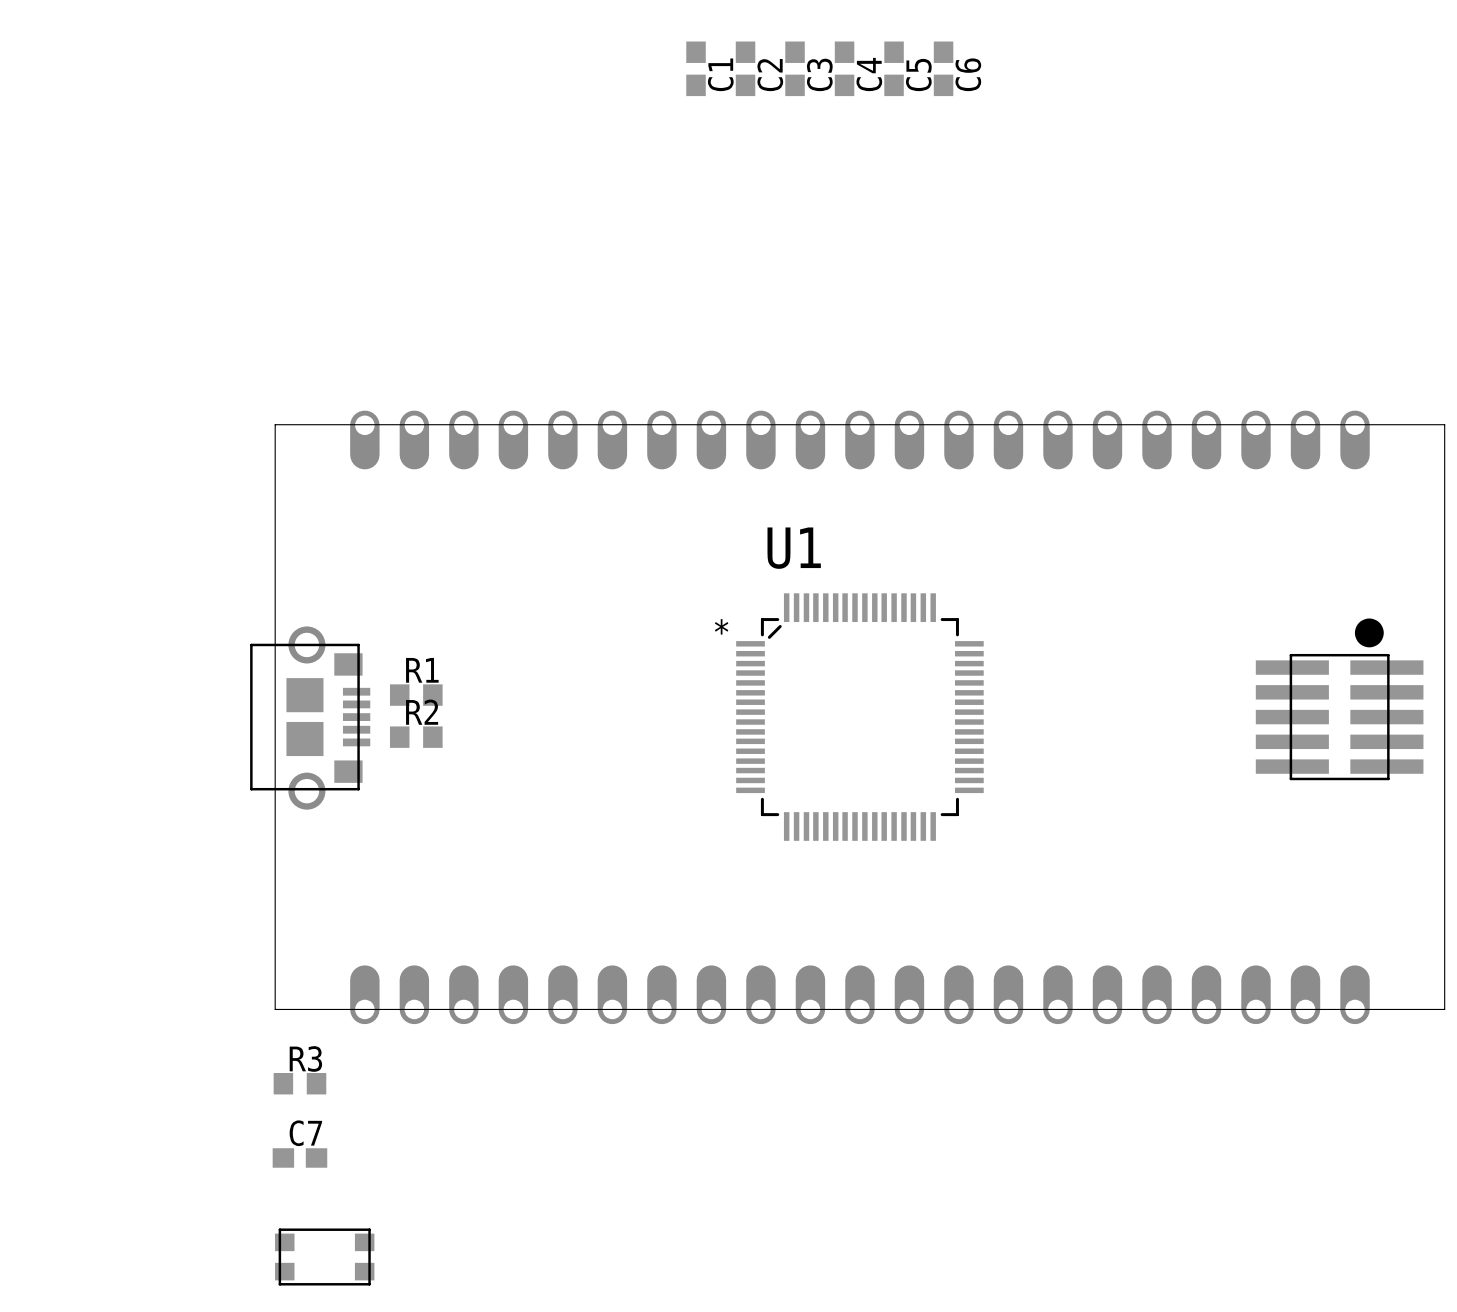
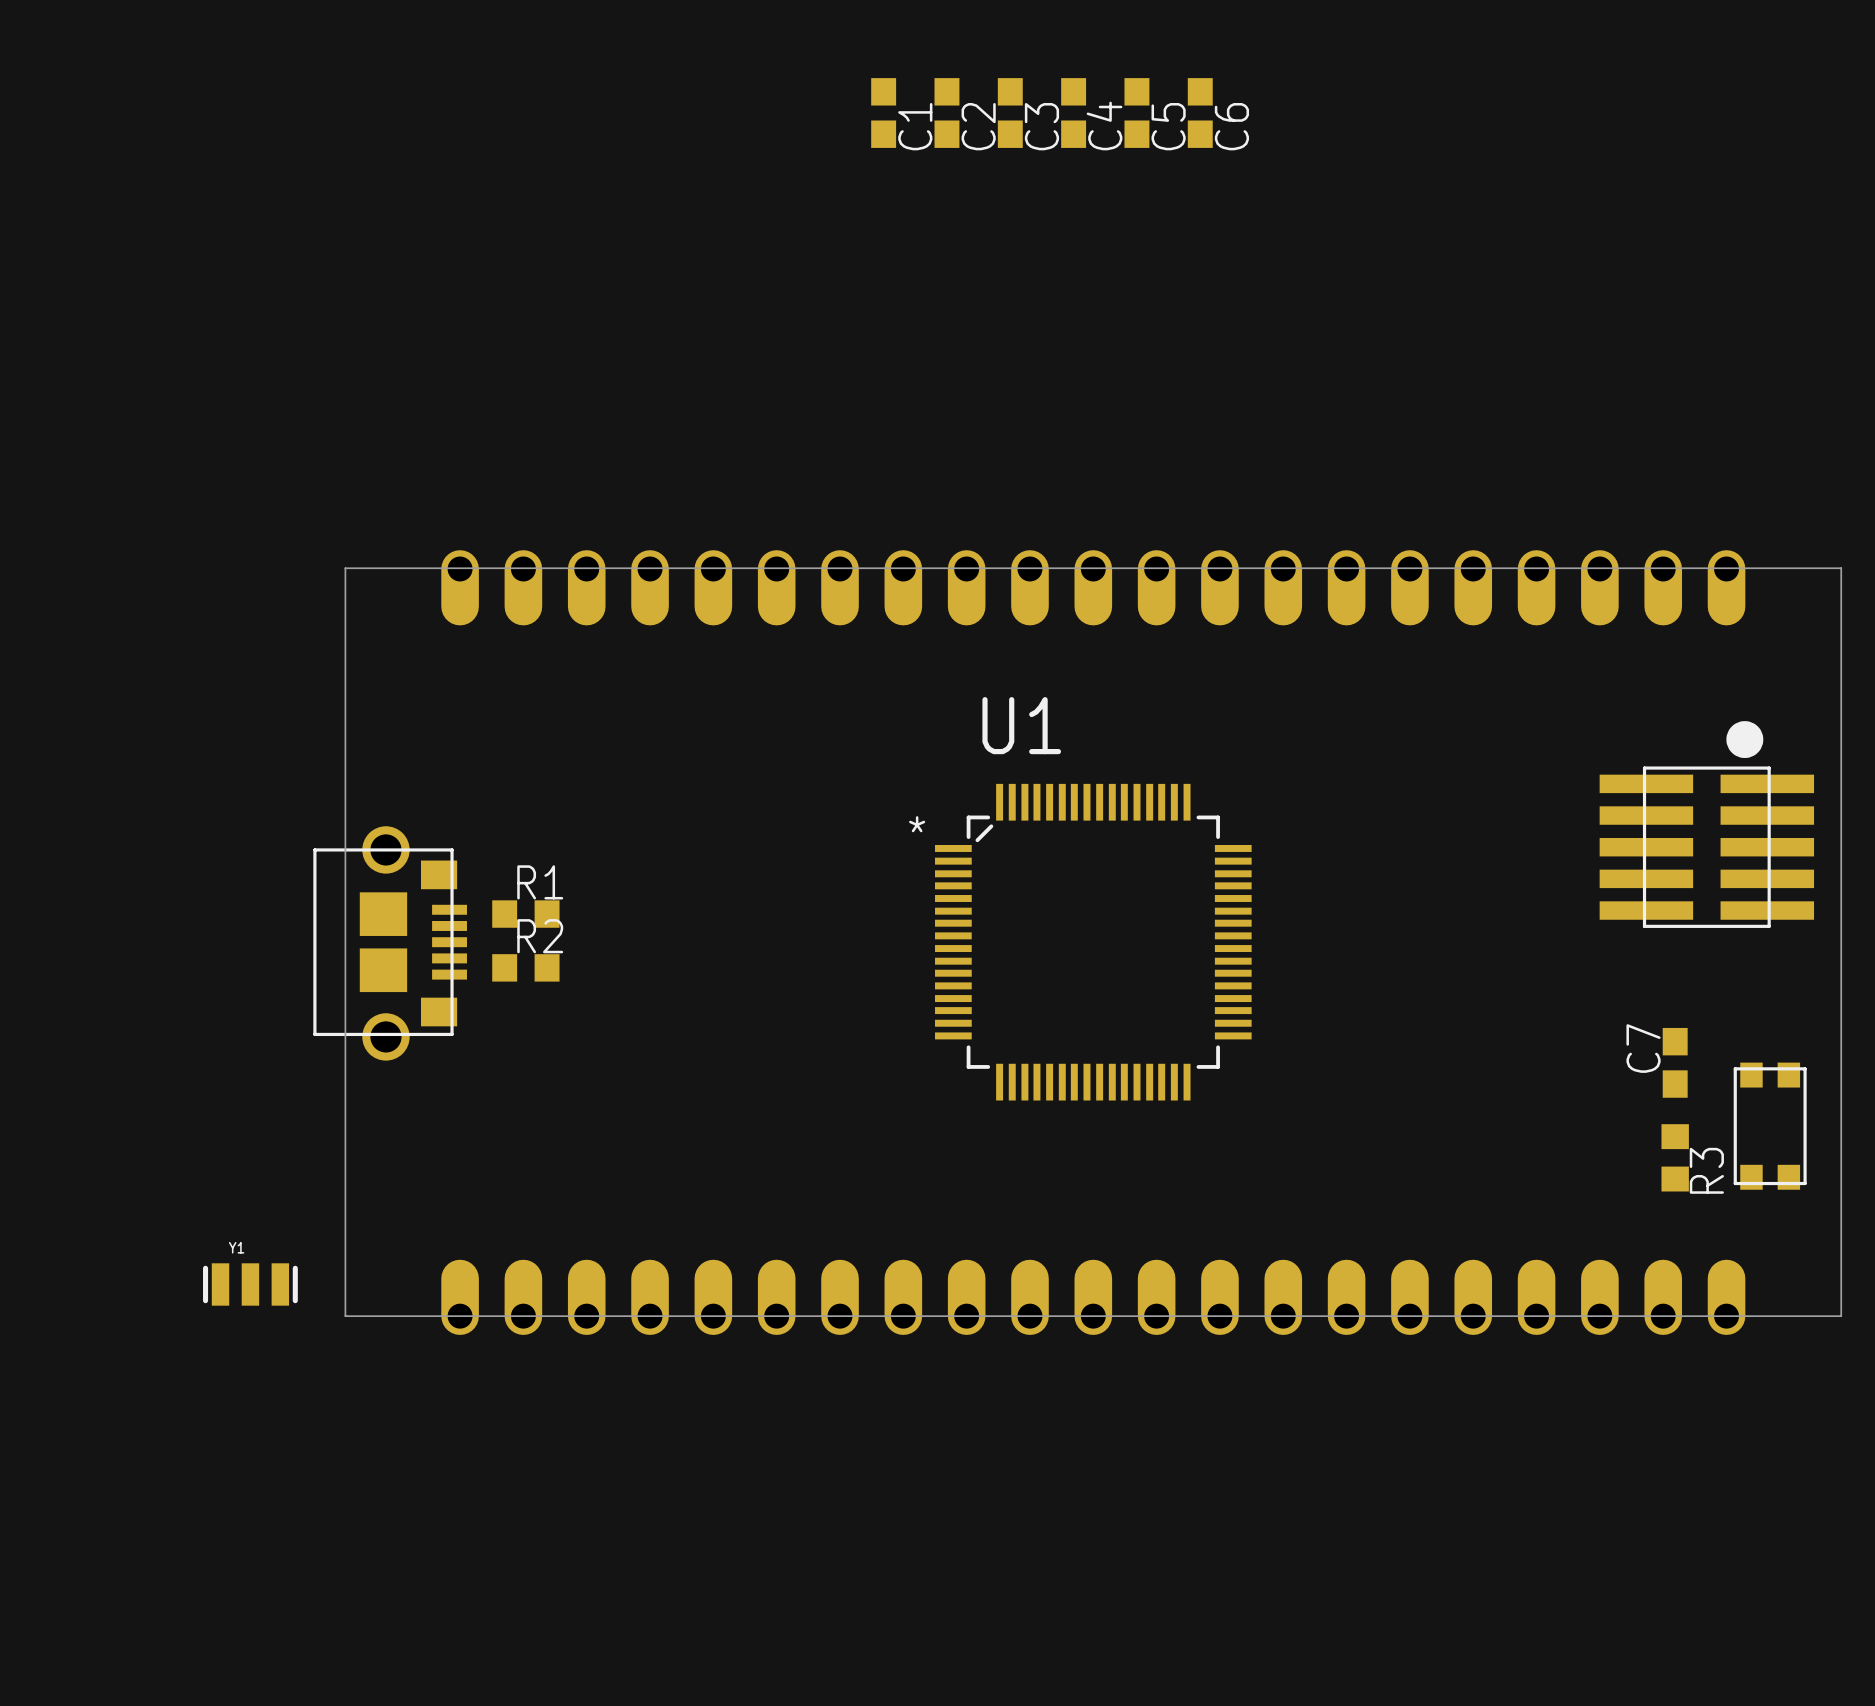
part position: (1339, 699) -> (1706, 824)
part: none -> (1770, 1126)
Y1: none -> (250, 1284)
R3 rotation: 0° (299, 1083) -> 90° clockwise (1675, 1157)
R3 position: (299, 1083) -> (1675, 1157)
C7 name position: C7 (305, 1133) -> C7 (1643, 1048)
C7 rotation: 0° (299, 1157) -> 90° clockwise (1675, 1062)
C7 position: (299, 1157) -> (1675, 1062)
part: (324, 1256) -> none

